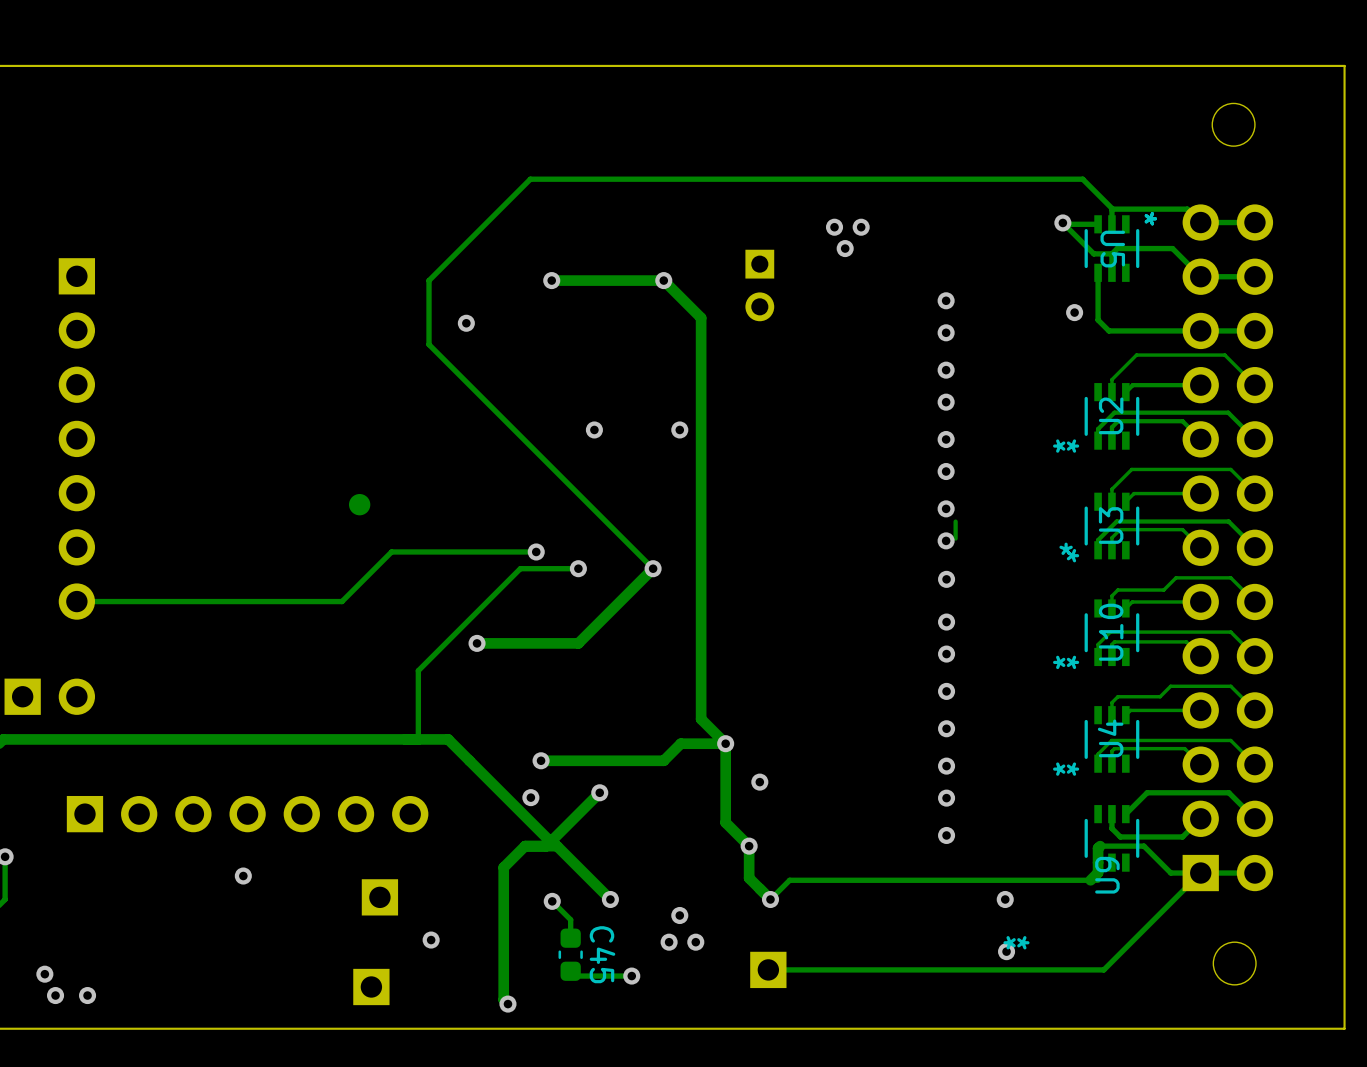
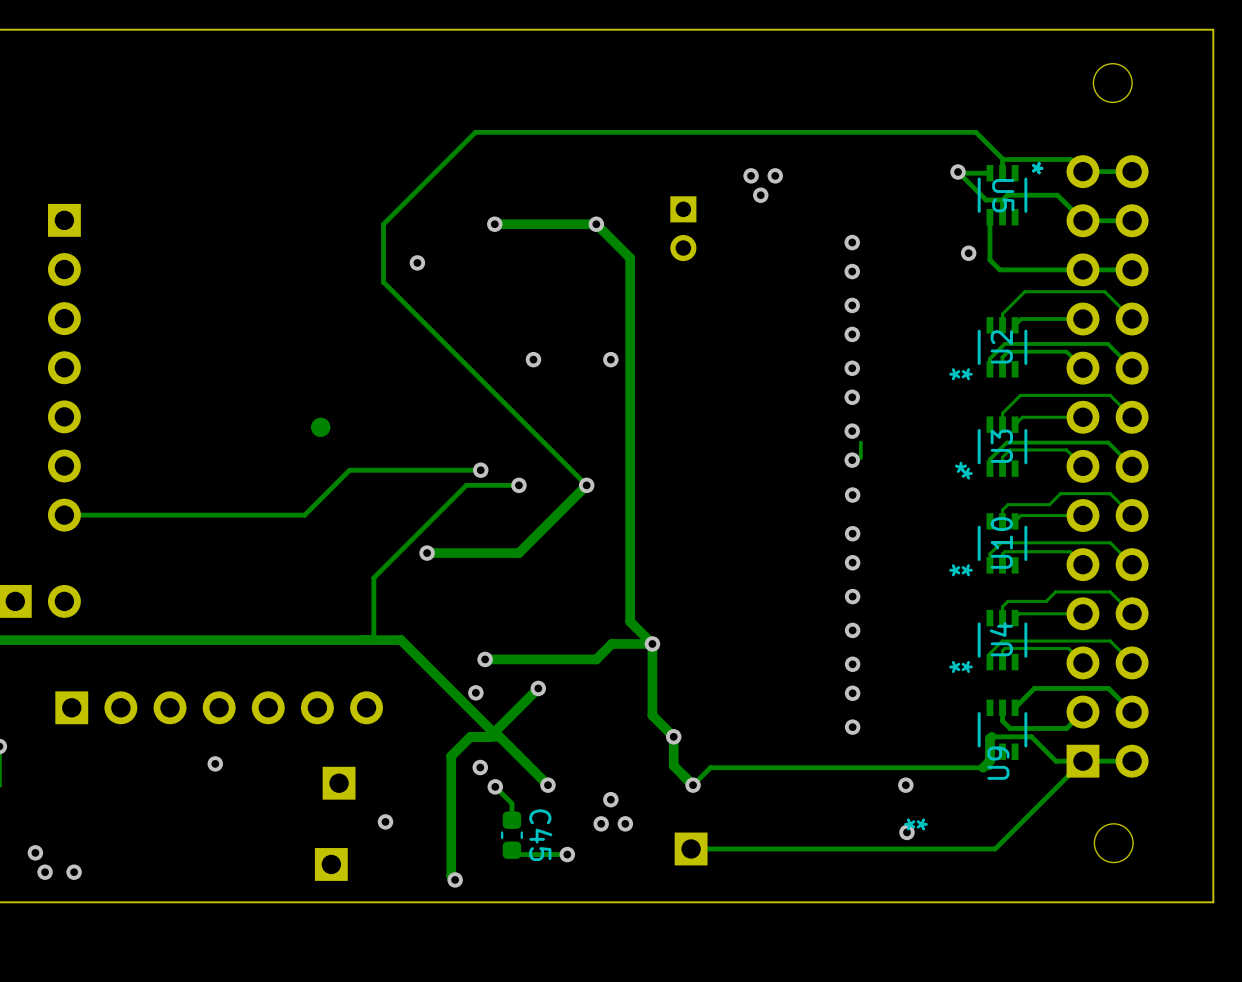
via: (759, 782) -> none
via: none -> (480, 767)

